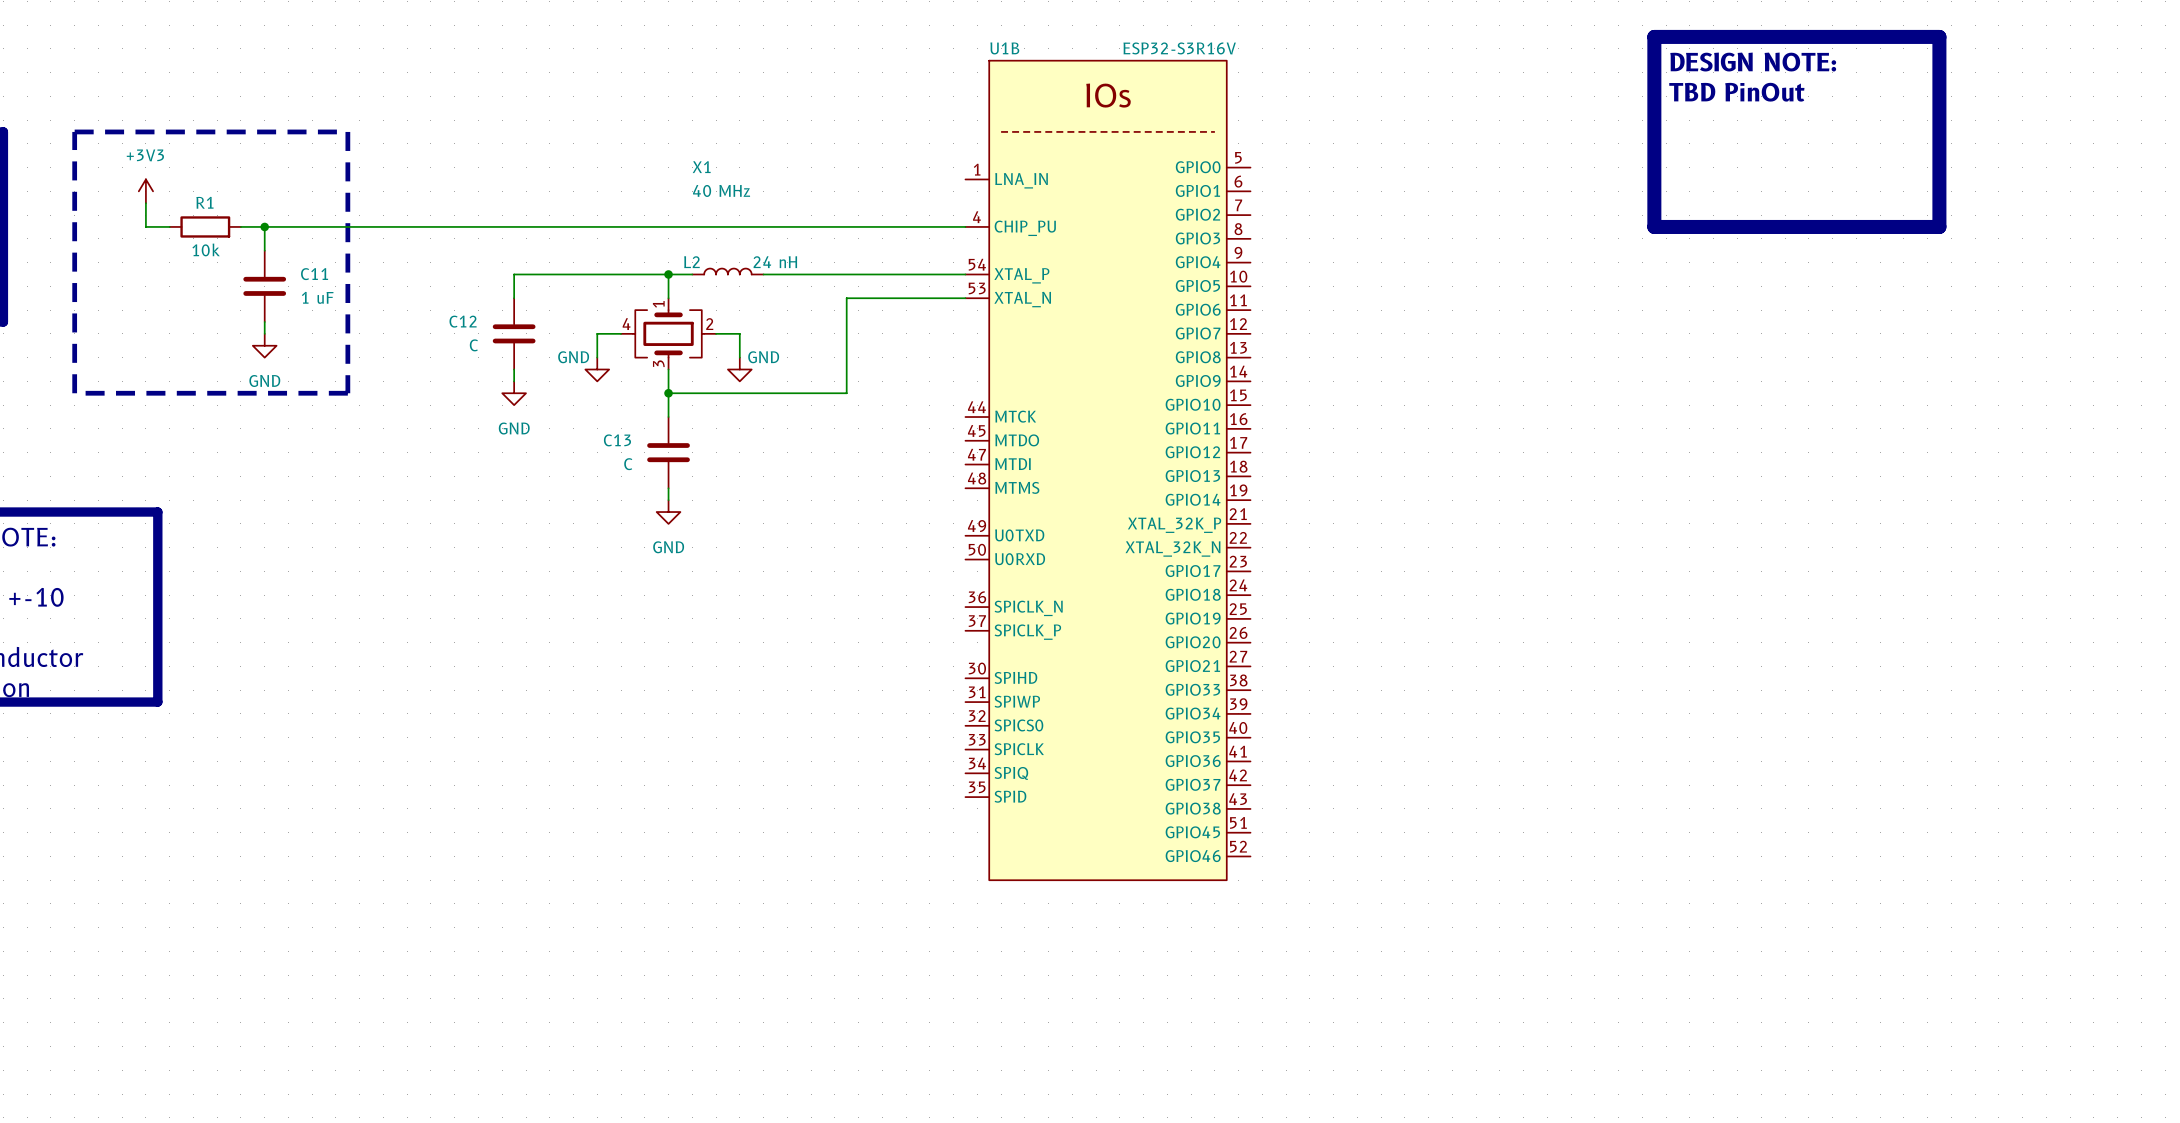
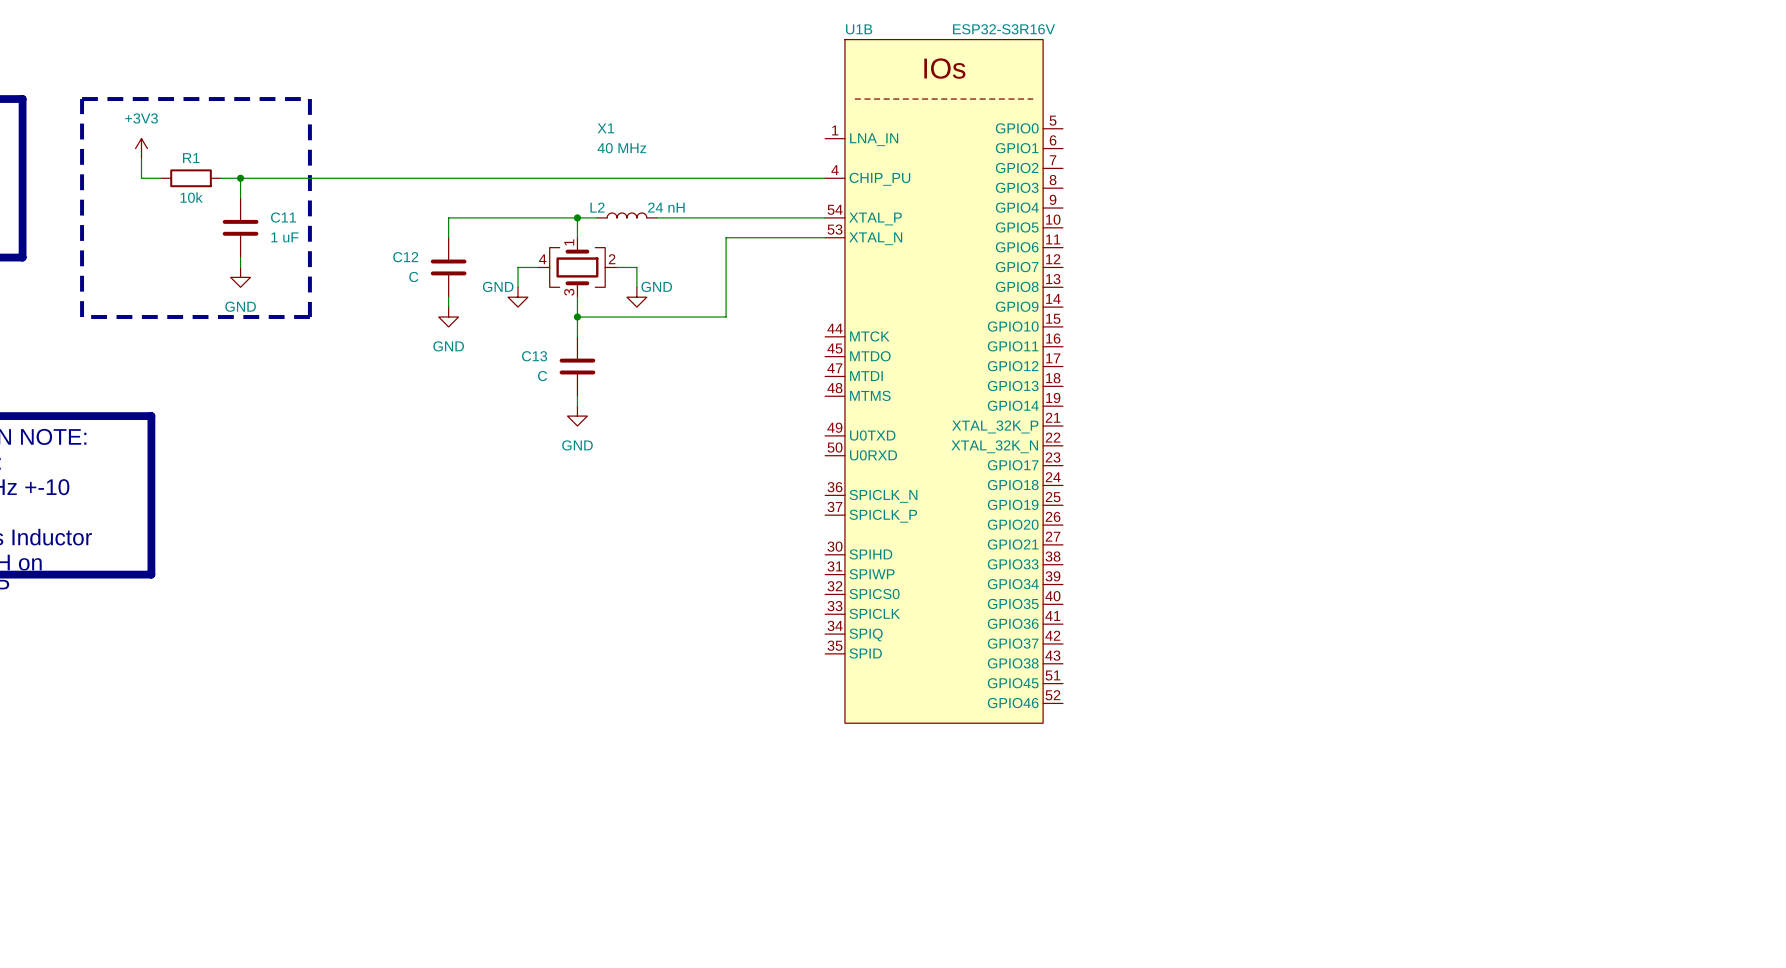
line: (1654, 36) (1939, 36) (1939, 226) (1654, 226) (1654, 36) -> none
text: DESIGN NOTE: (1753, 62) -> none
text: TBD PinOut (1736, 92) -> none

